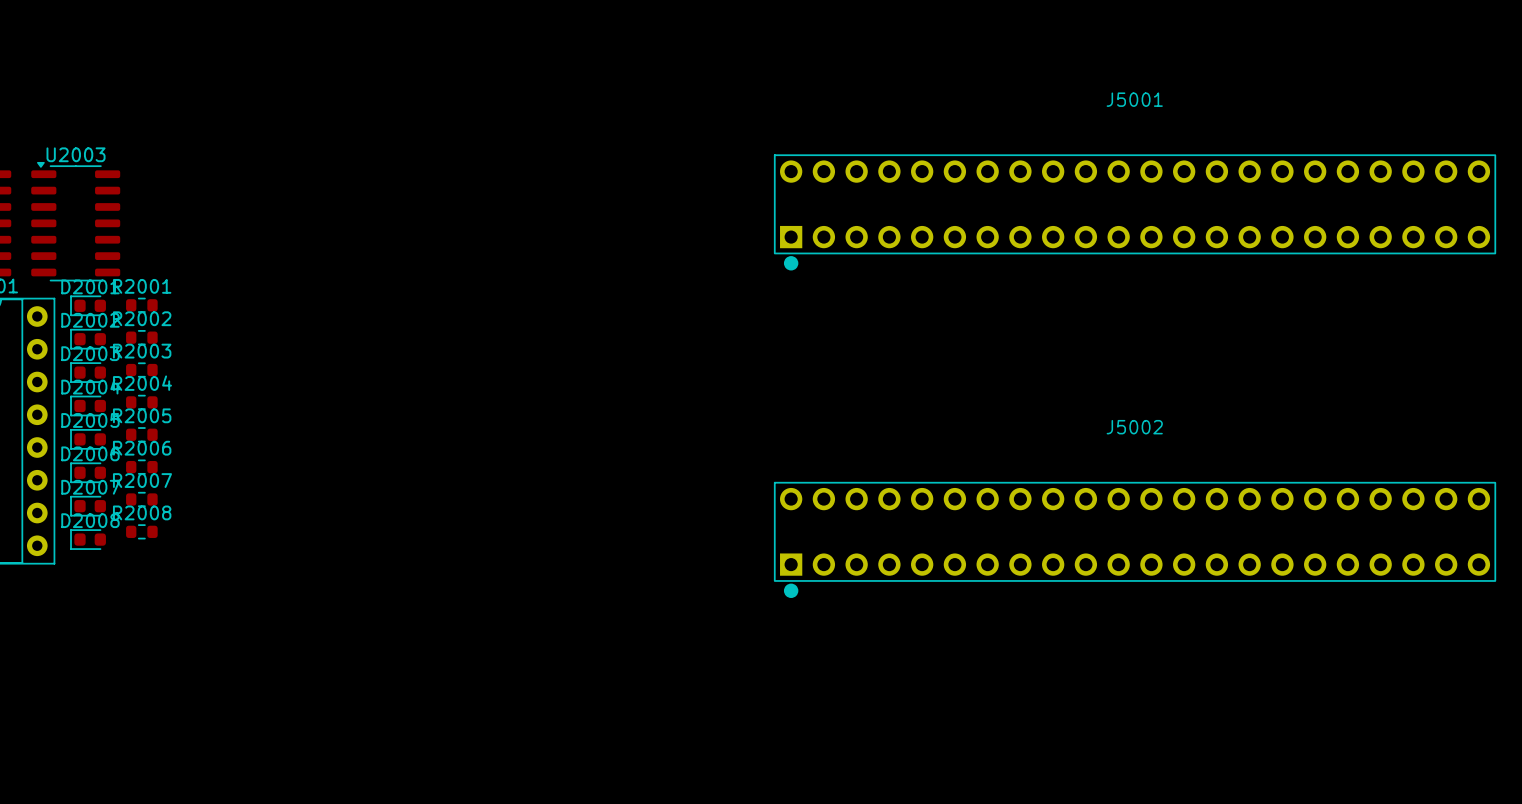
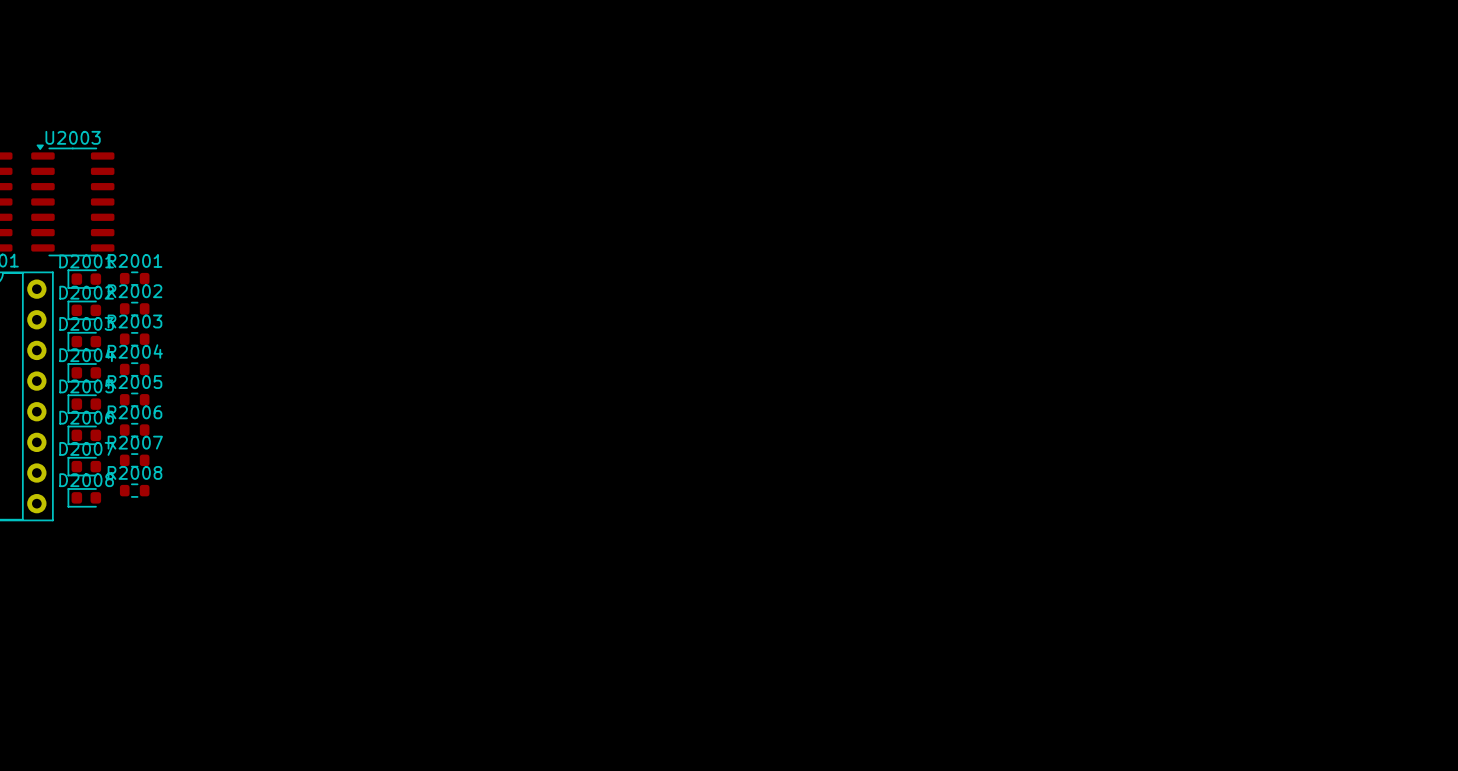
J5001: (1135, 212) -> none
J5002: (1135, 540) -> none

